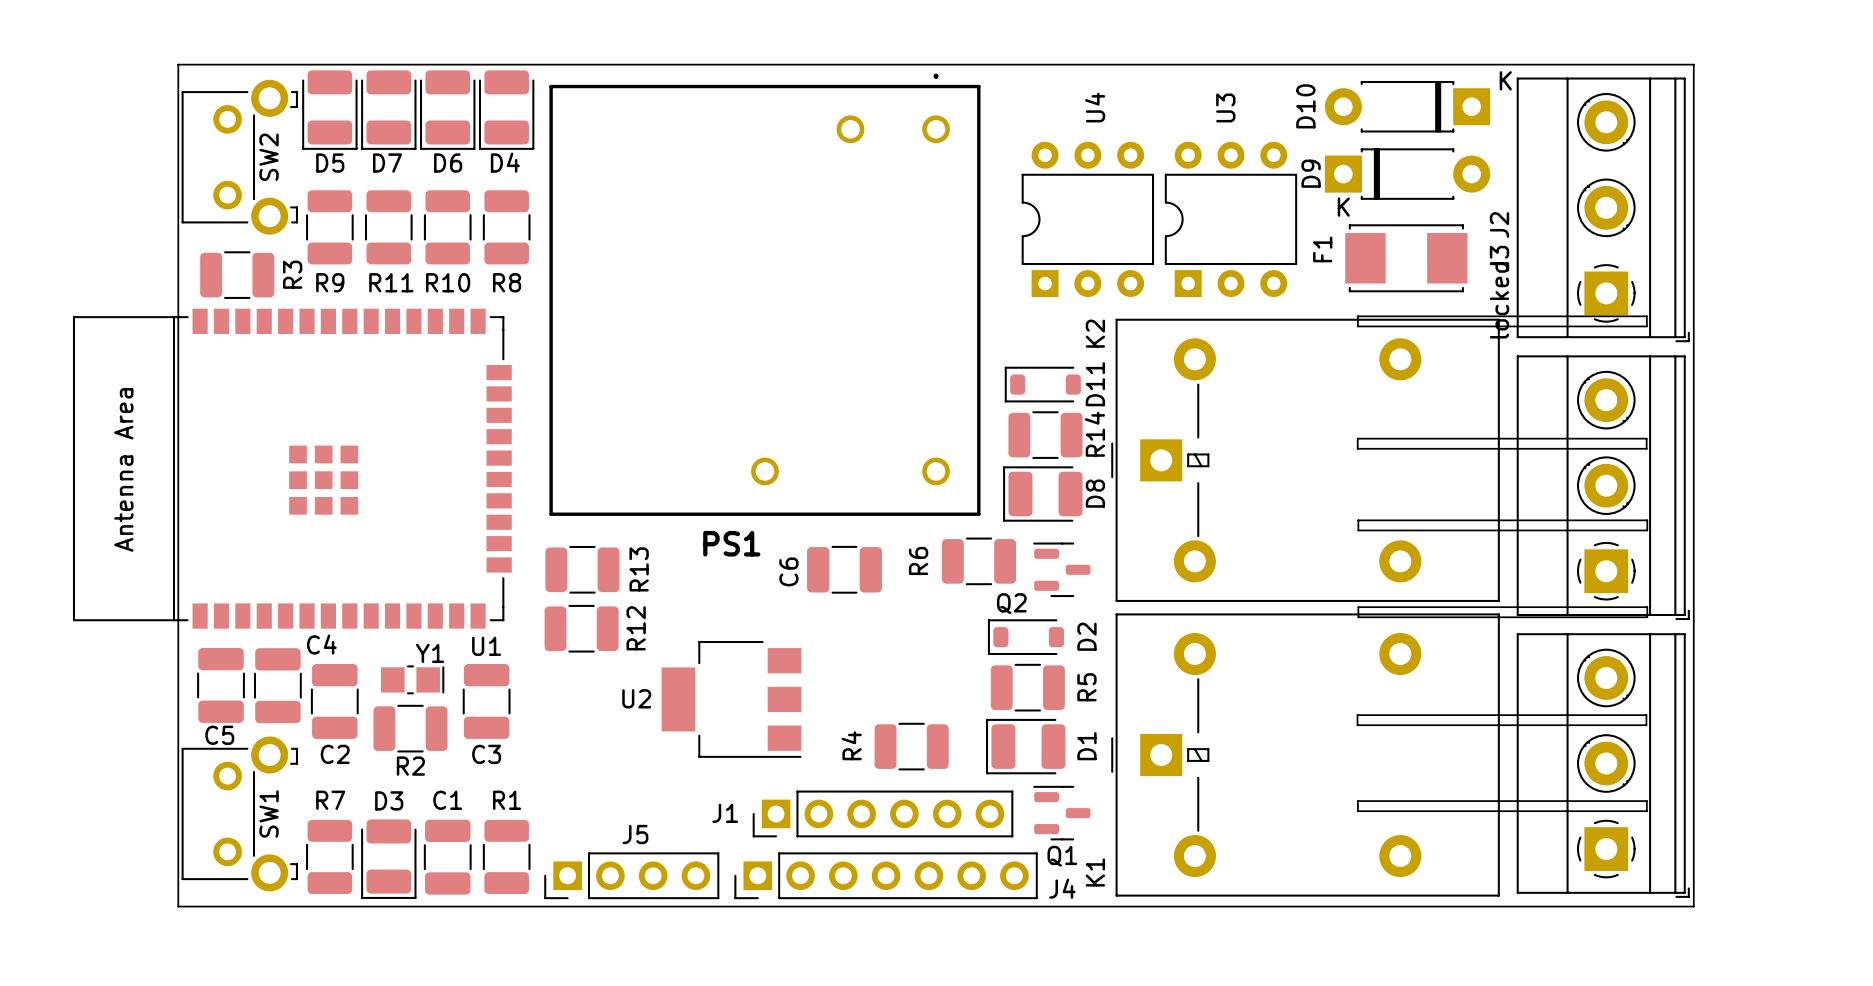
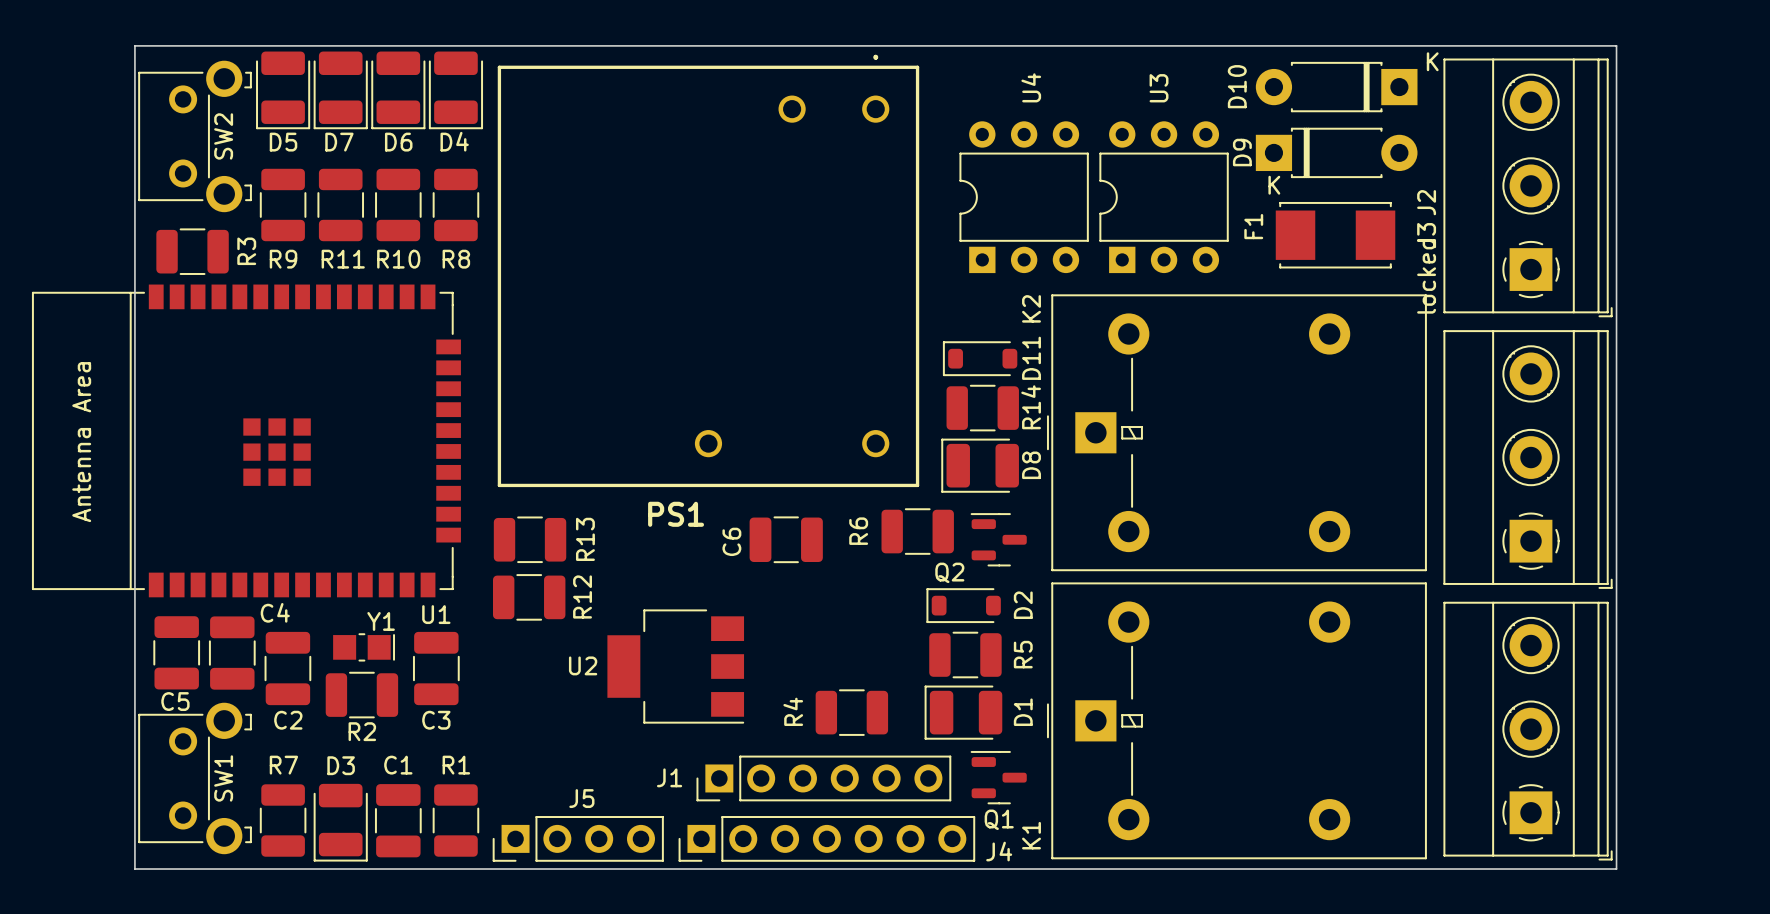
board edge: (1357, 316) (1357, 326) (1646, 326) (1646, 316) (1357, 316) -> none
board edge: (1357, 438) (1646, 438) (1646, 448) (1357, 448) (1357, 438) -> none
board edge: (1358, 520) (1647, 520) (1647, 530) (1358, 530) (1358, 520) -> none
board edge: (1358, 607) (1358, 617) (1647, 617) (1647, 607) (1358, 607) -> none
board edge: (1357, 715) (1646, 715) (1646, 725) (1357, 725) (1357, 715) -> none
board edge: (1357, 801) (1646, 801) (1646, 811) (1357, 811) (1357, 801) -> none

